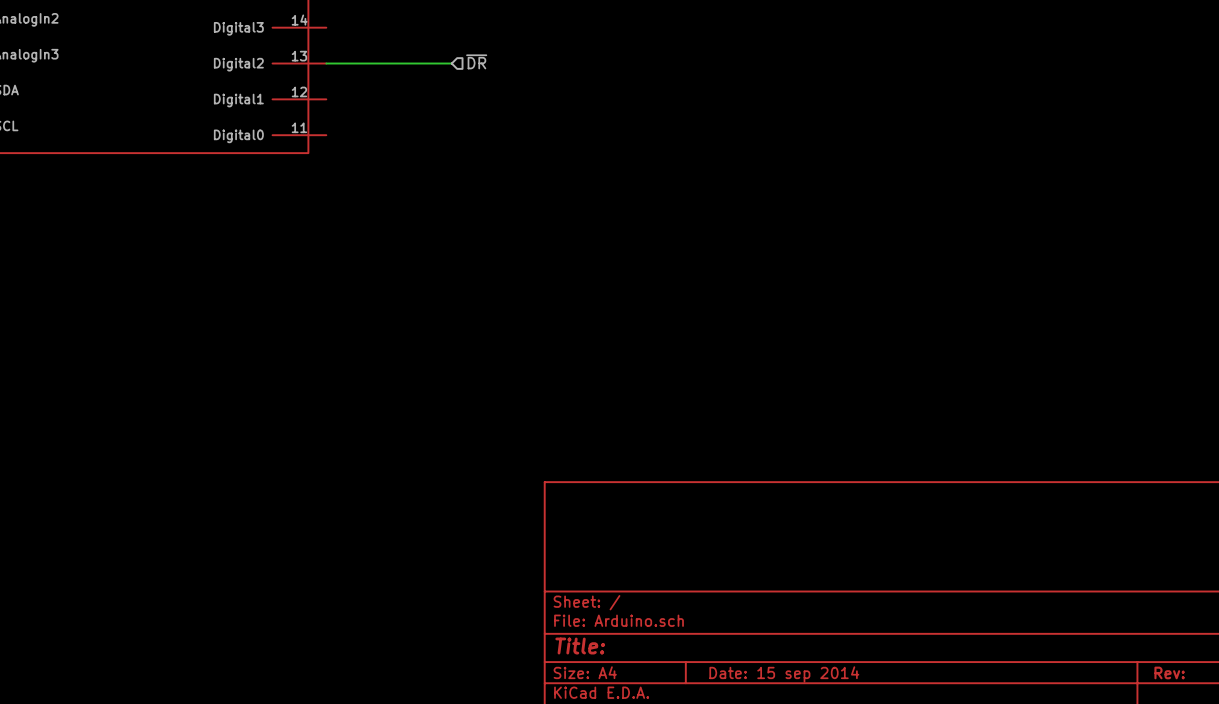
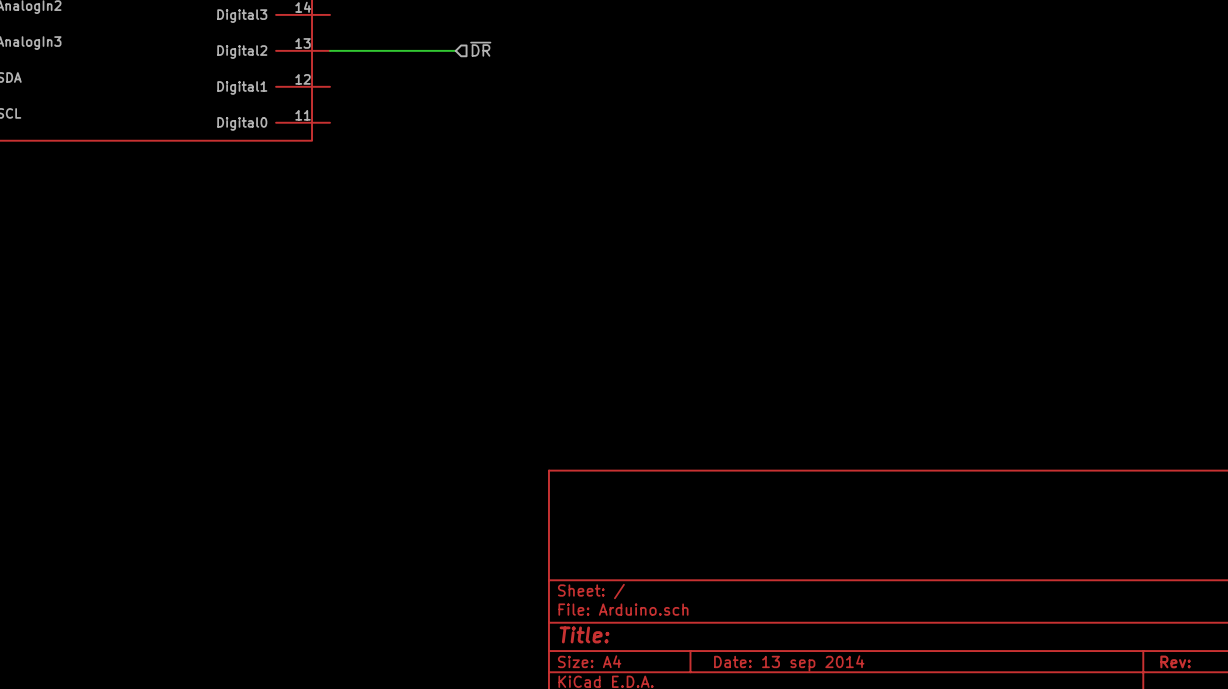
title block: Date: 15 sep 2014 (784, 674) -> Date: 13 sep 2014 (789, 663)

